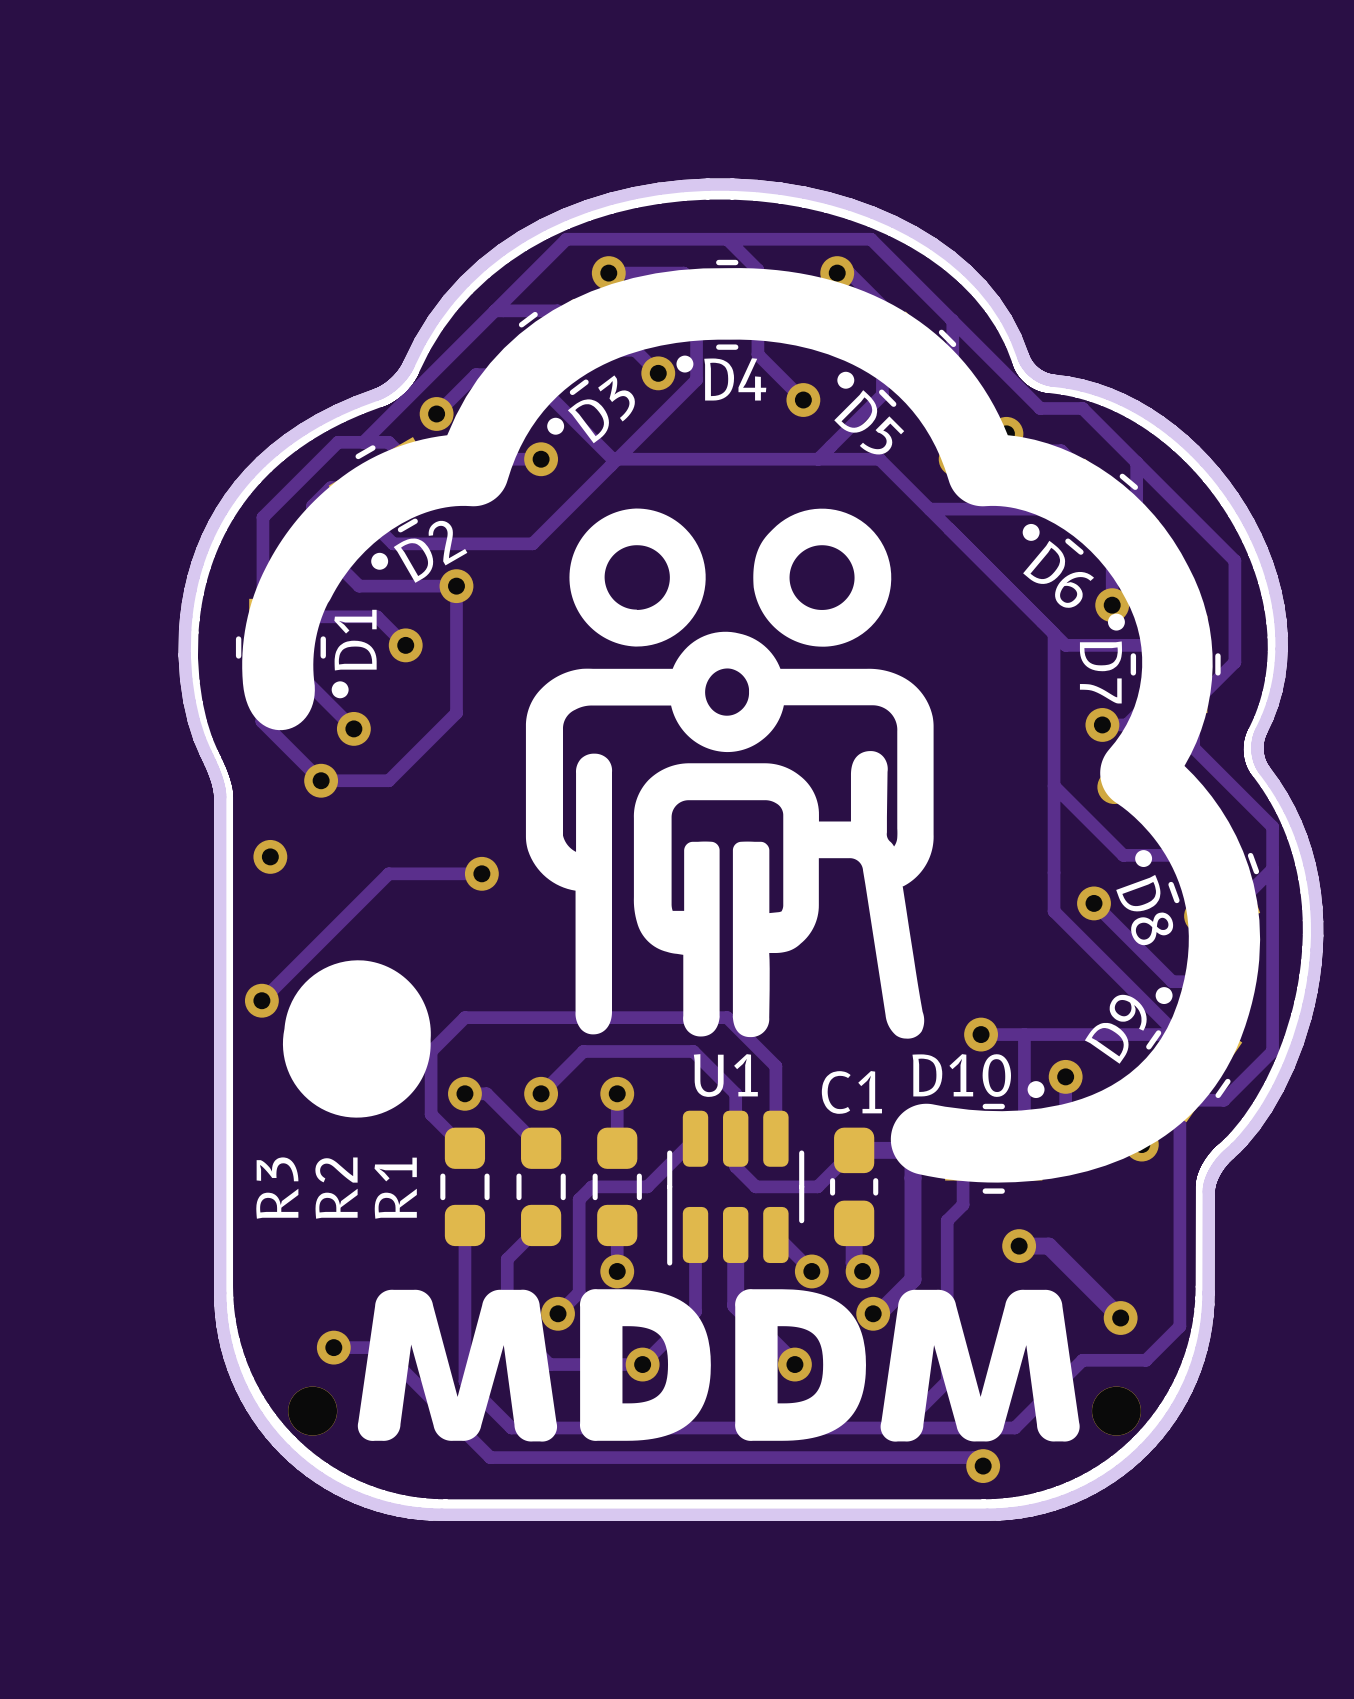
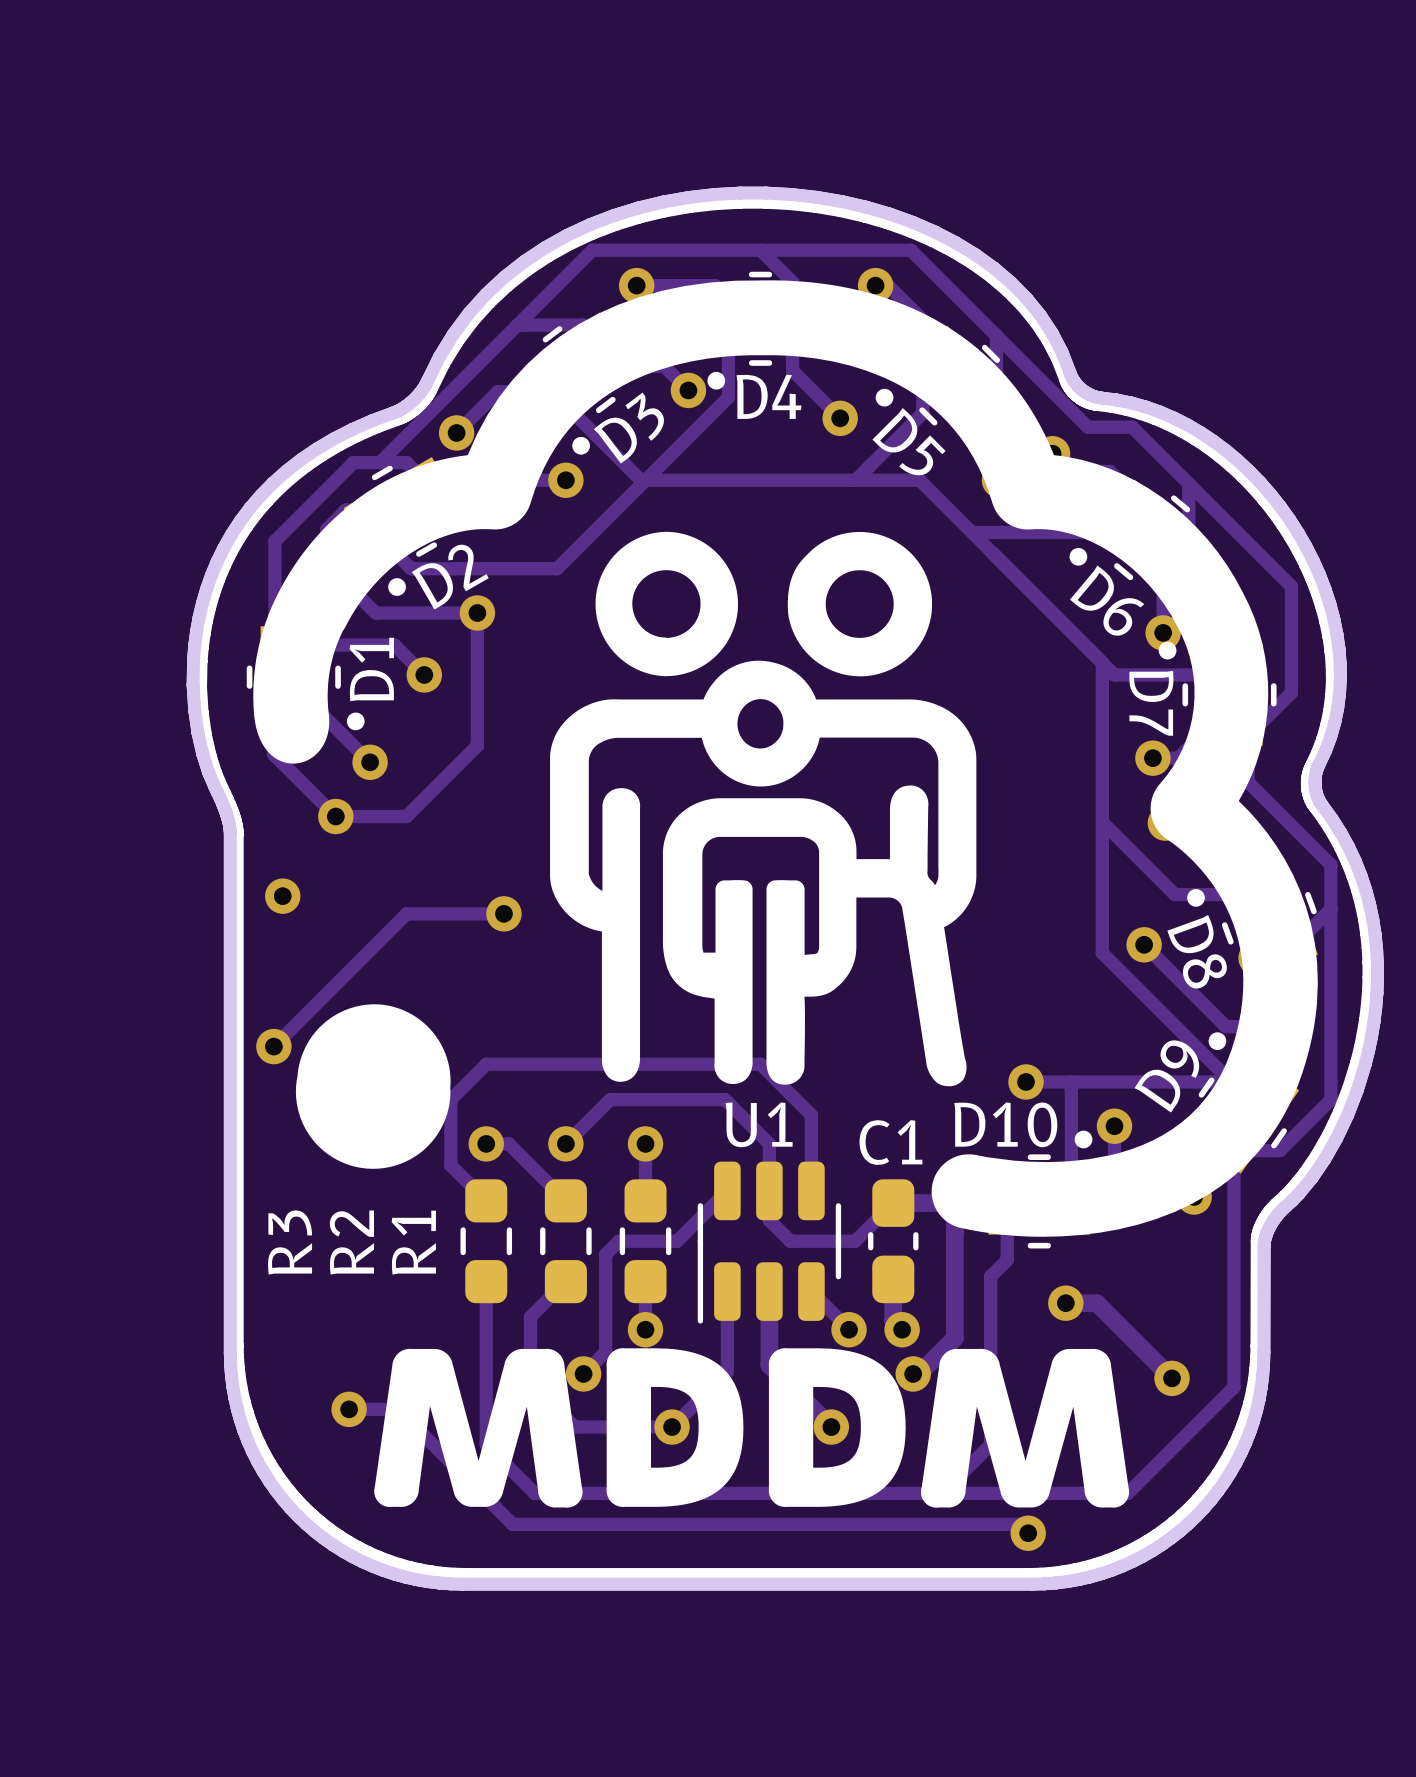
track: (1146, 1360) (1082, 1360) (1014, 1428) -> (1198, 1422) (1127, 1493) (1061, 1493)
via: (312, 1411) -> none
via: (1116, 1411) -> none

